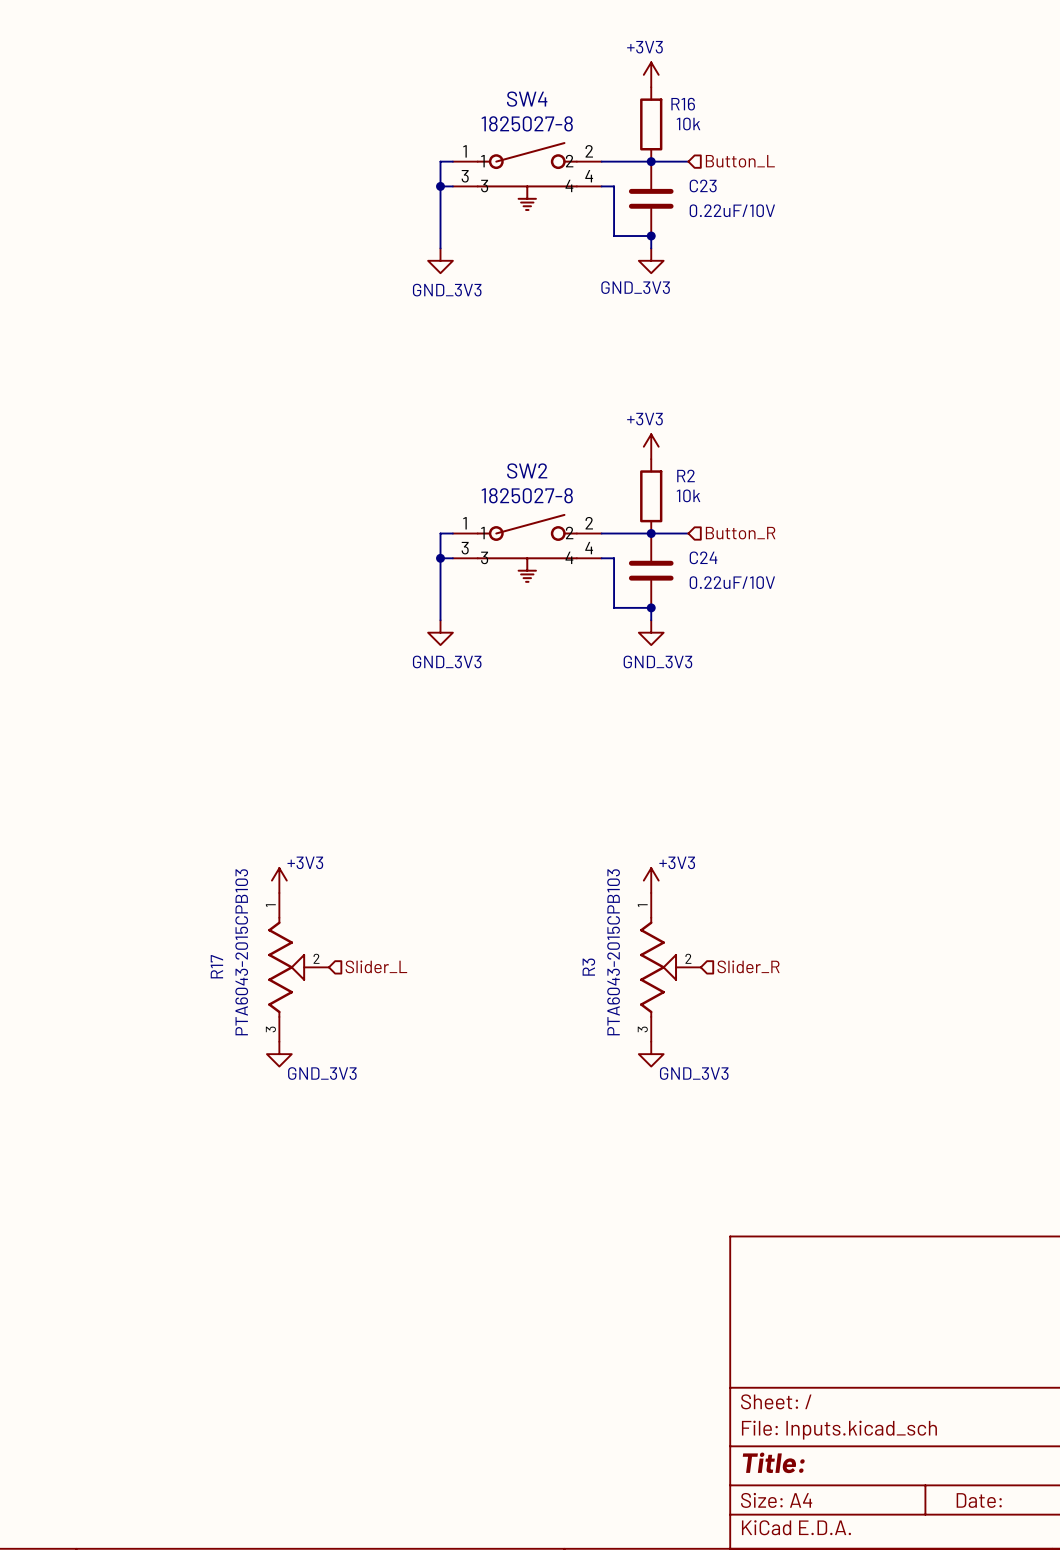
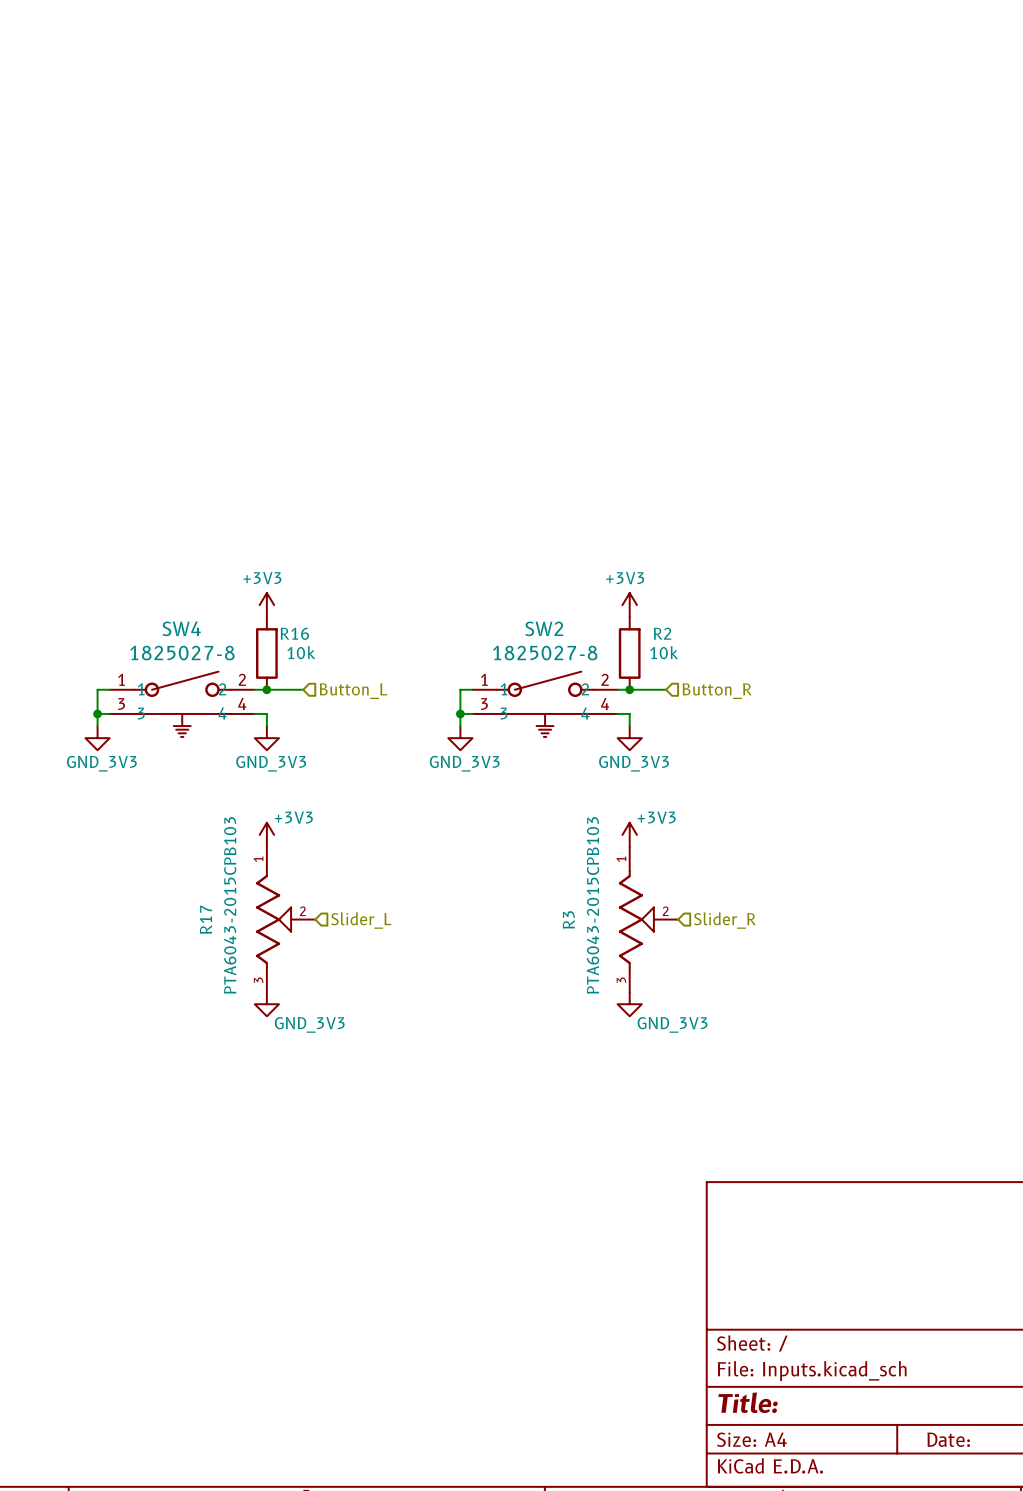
power symbol: +3V3 (651, 74) -> none
R16 position: (651, 124) -> (266, 653)
wire: (452, 161) (440, 161) (440, 248) -> none
wire: (601, 161) (688, 161) -> none
junction: (651, 161) -> none
hierarchical label: Button_L (740, 161) -> none
SW4 position: (527, 176) -> (182, 704)
wire: (440, 186) (452, 186) -> none
junction: (440, 186) -> none
wire: (601, 186) (614, 186) (614, 236) (651, 236) (651, 248) -> none
C23: 0.22uF/10V (651, 198) -> none
junction: (651, 236) -> none
power symbol: GND_3V3 (440, 260) -> none
power symbol: GND_3V3 (651, 260) -> none
power symbol position: +3V3 (651, 446) -> +3V3 (629, 605)
R2 position: (651, 496) -> (629, 653)
wire: (452, 533) (440, 533) (440, 620) -> none
wire: (601, 533) (688, 533) -> none
junction: (651, 533) -> none
hierarchical label position: Button_R (740, 533) -> Button_R (717, 691)
SW2 position: (527, 548) -> (545, 704)
wire: (440, 558) (452, 558) -> (460, 713) (472, 713)
junction: (440, 558) -> none
wire: (601, 558) (614, 558) (614, 607) (651, 607) (651, 620) -> none
C24: 0.22uF/10V (651, 570) -> none
junction: (651, 607) -> none
power symbol: GND_3V3 (440, 632) -> none
power symbol: GND_3V3 (651, 632) -> none
power symbol: none -> +3V3 (266, 605)
wire: none -> (109, 689) (97, 689) (97, 726)
wire: none -> (254, 689) (303, 689)
junction: none -> (266, 689)
hierarchical label: none -> Button_L (353, 691)
wire: none -> (472, 689) (460, 689) (460, 726)
wire: none -> (617, 689) (665, 689)
junction: none -> (629, 689)
wire: none -> (97, 713) (109, 713)
junction: none -> (97, 713)
wire: none -> (254, 713) (266, 713) (266, 726)
junction: none -> (460, 713)
wire: none -> (617, 713) (629, 713) (629, 726)
power symbol: none -> GND_3V3 (97, 738)
power symbol: none -> GND_3V3 (266, 738)
power symbol: none -> GND_3V3 (460, 738)
power symbol: none -> GND_3V3 (629, 738)

